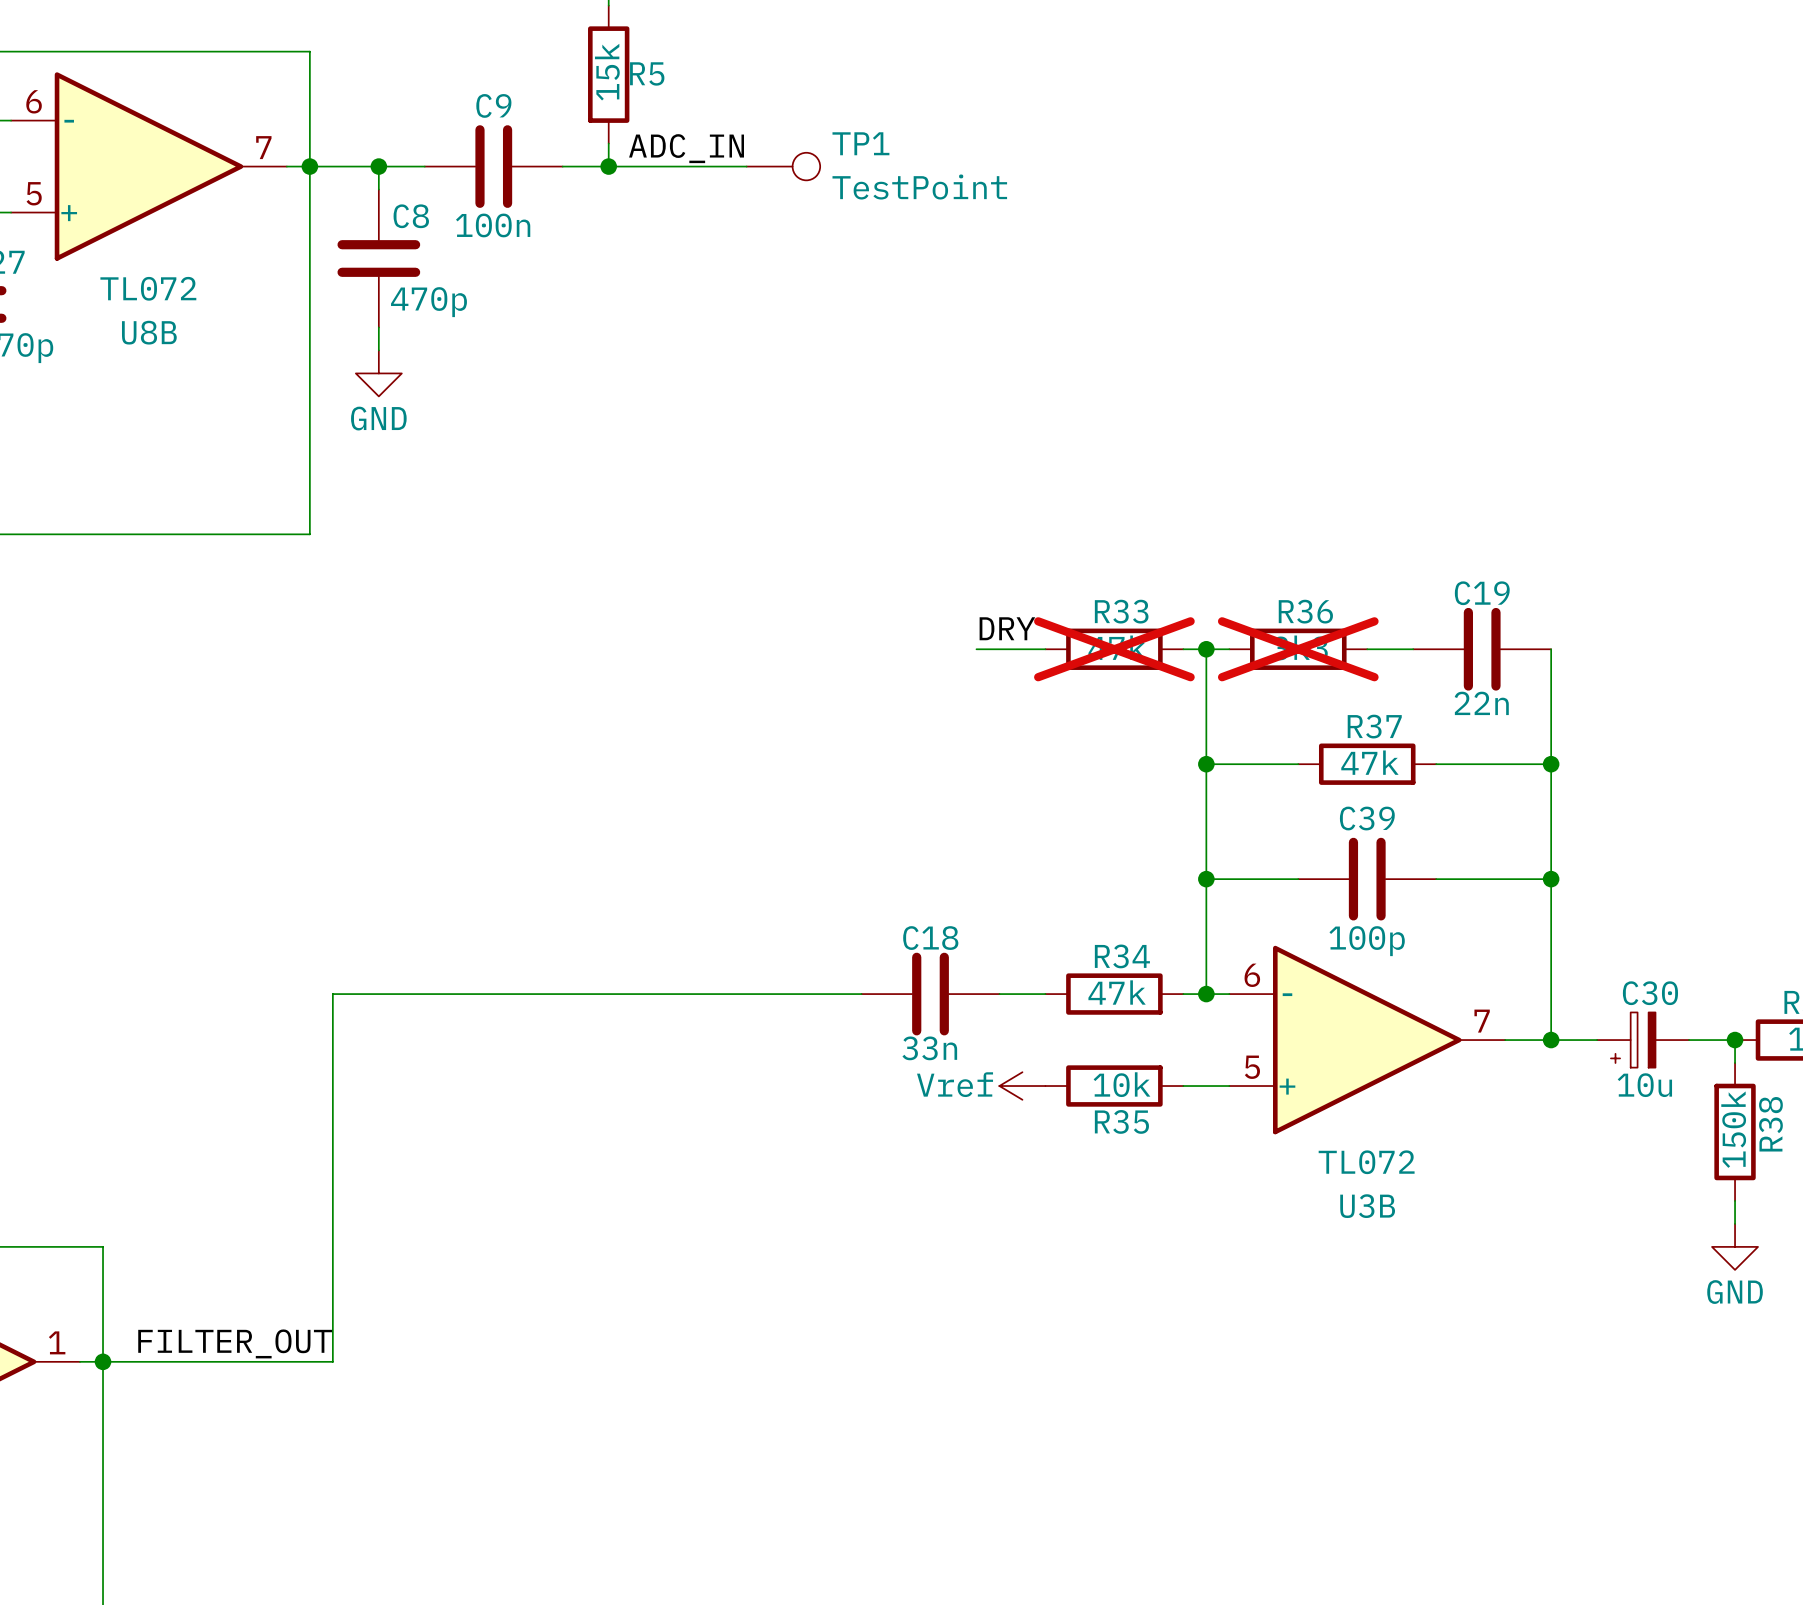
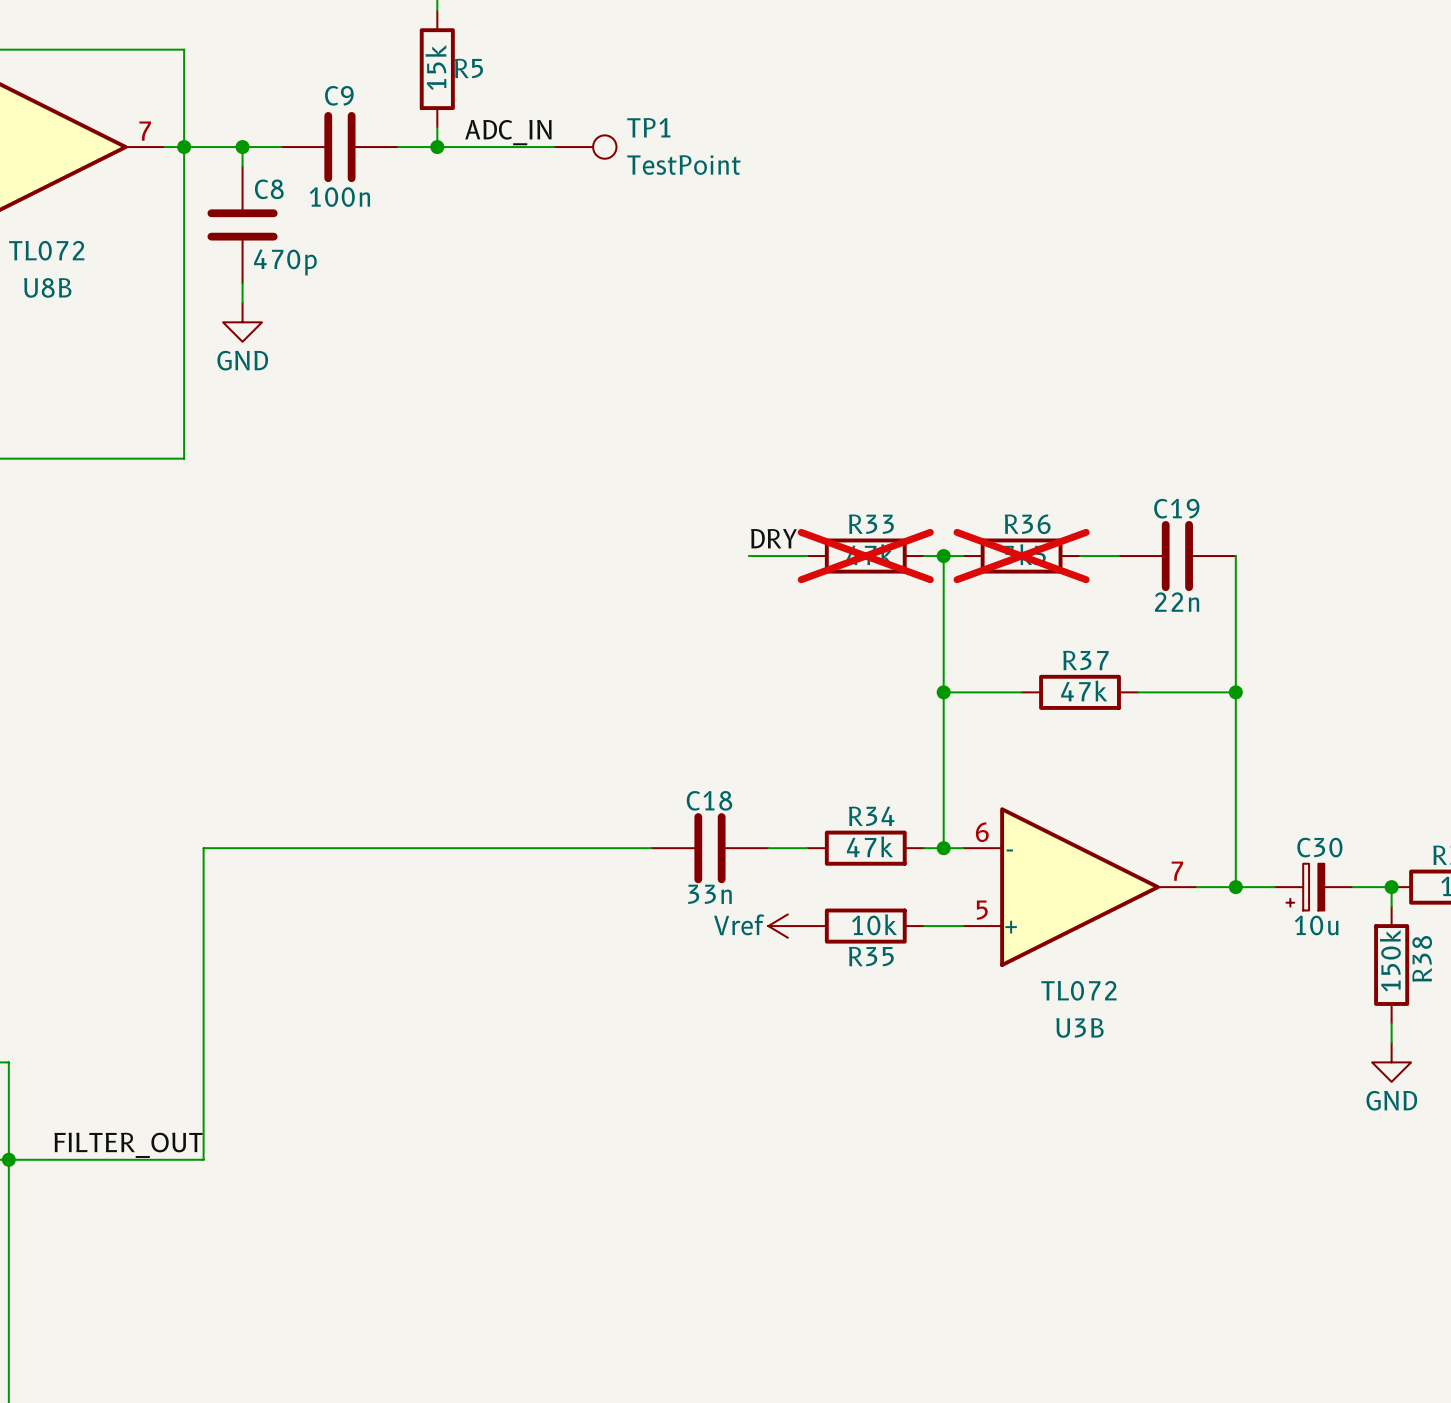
wire: (1206, 764) (1298, 764) -> (943, 692) (1021, 692)
junction: (1206, 764) -> none
R37 position: (1367, 764) -> (1080, 692)
wire: (1436, 764) (1551, 764) -> (1138, 692) (1235, 692)
junction: (1551, 764) -> none
junction: none -> (943, 692)
junction: none -> (1235, 692)
wire: (1206, 879) (1298, 879) -> none
junction: (1206, 879) -> none
C39: 100p (1367, 879) -> none
wire: (1436, 879) (1551, 879) -> none
junction: (1551, 879) -> none

